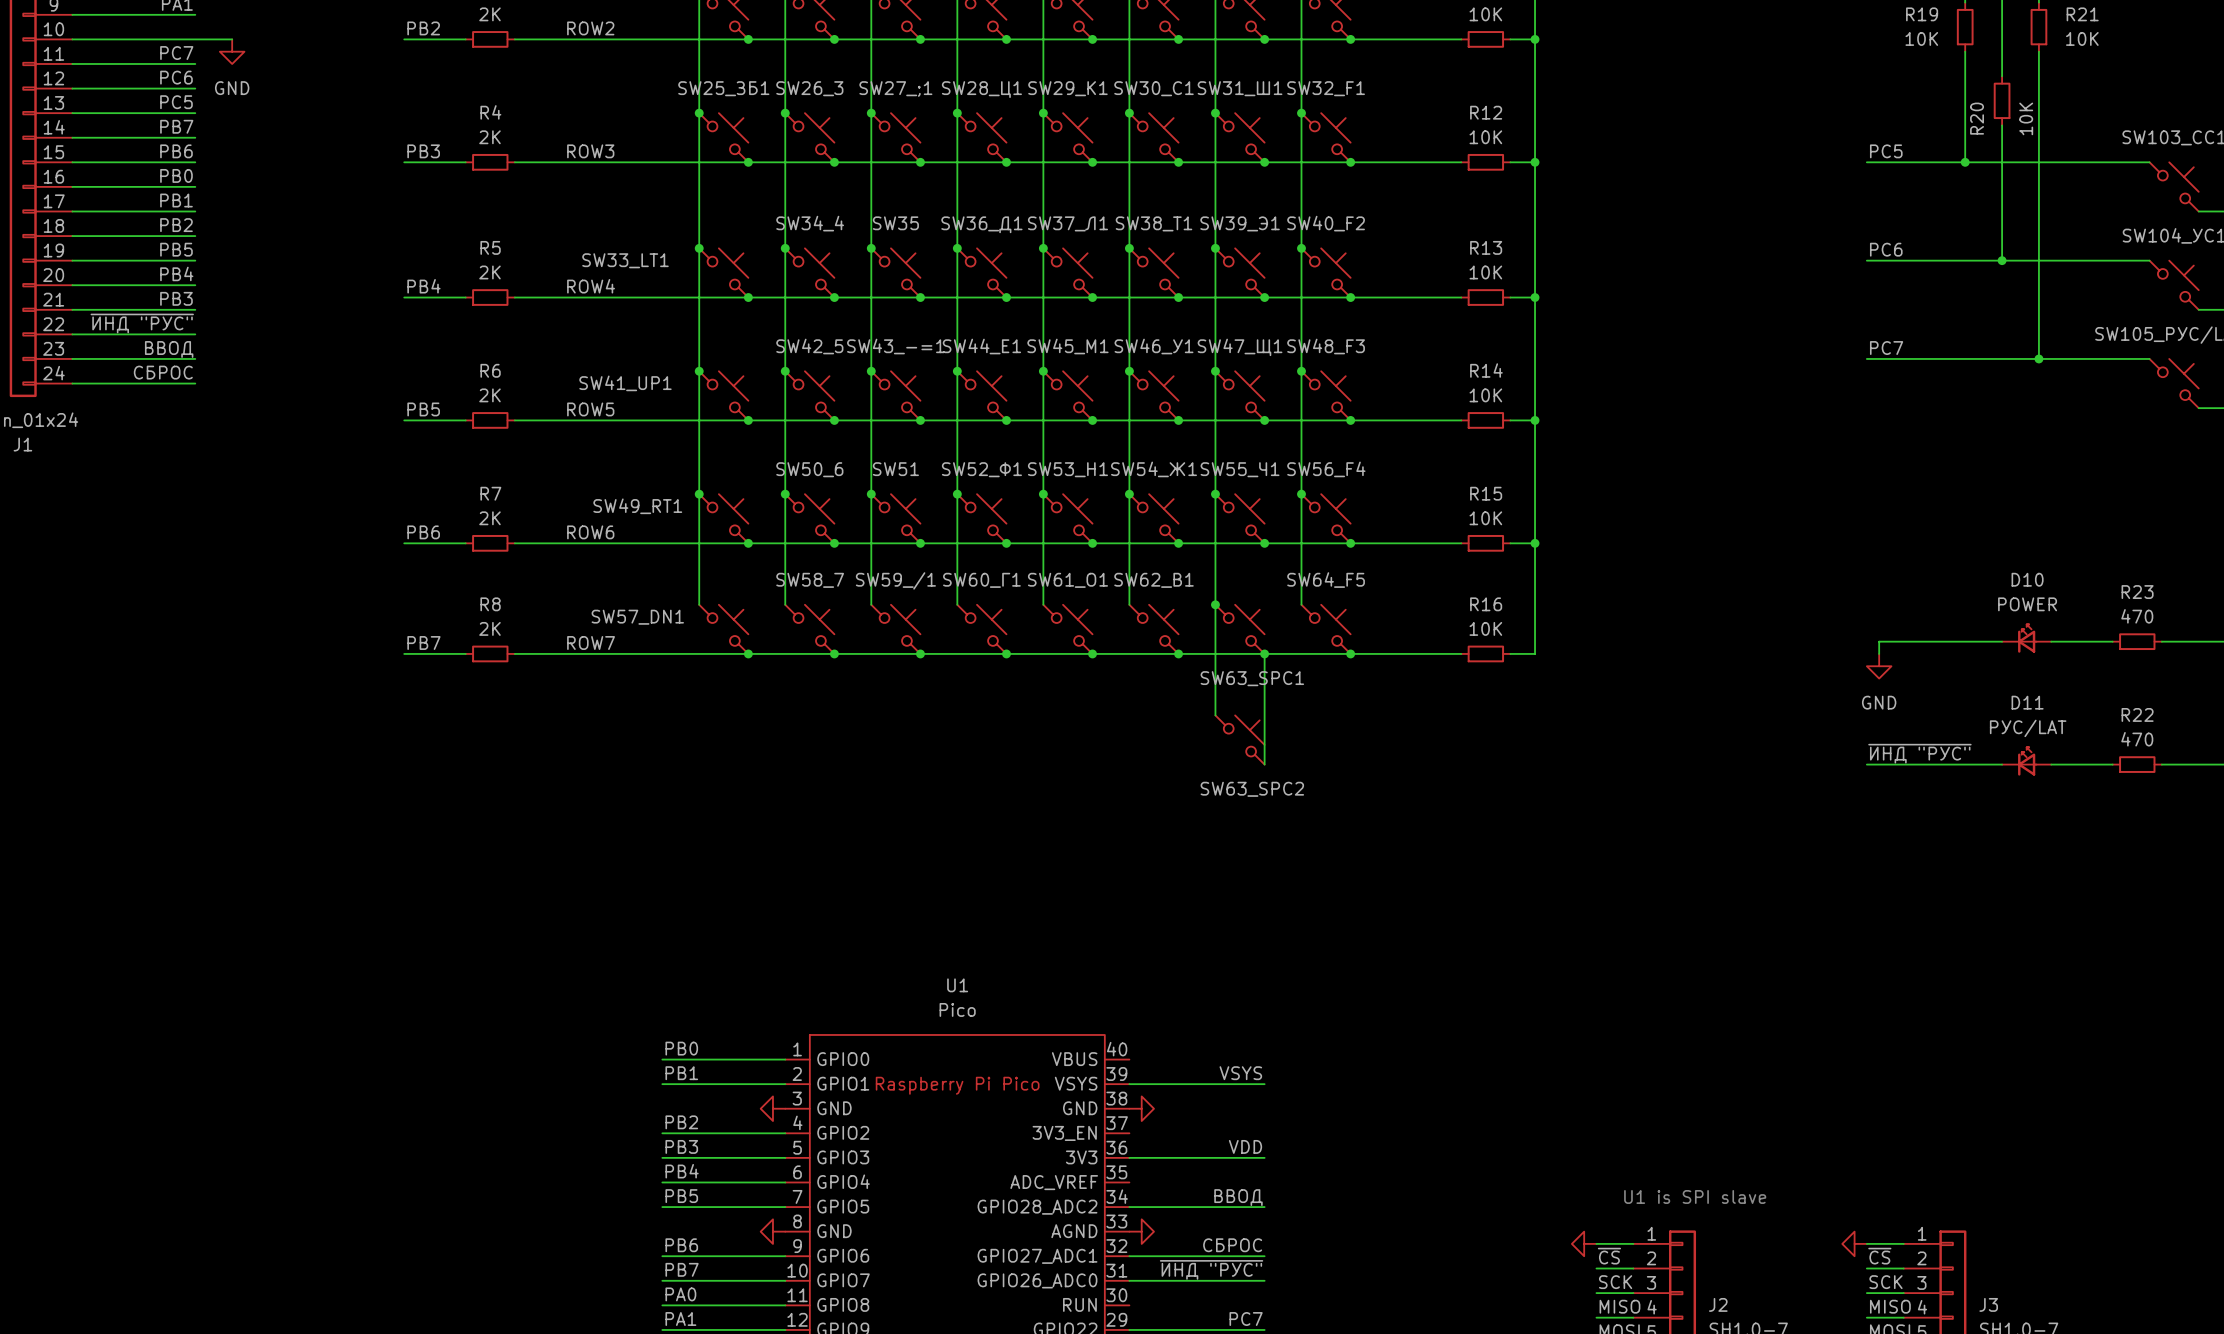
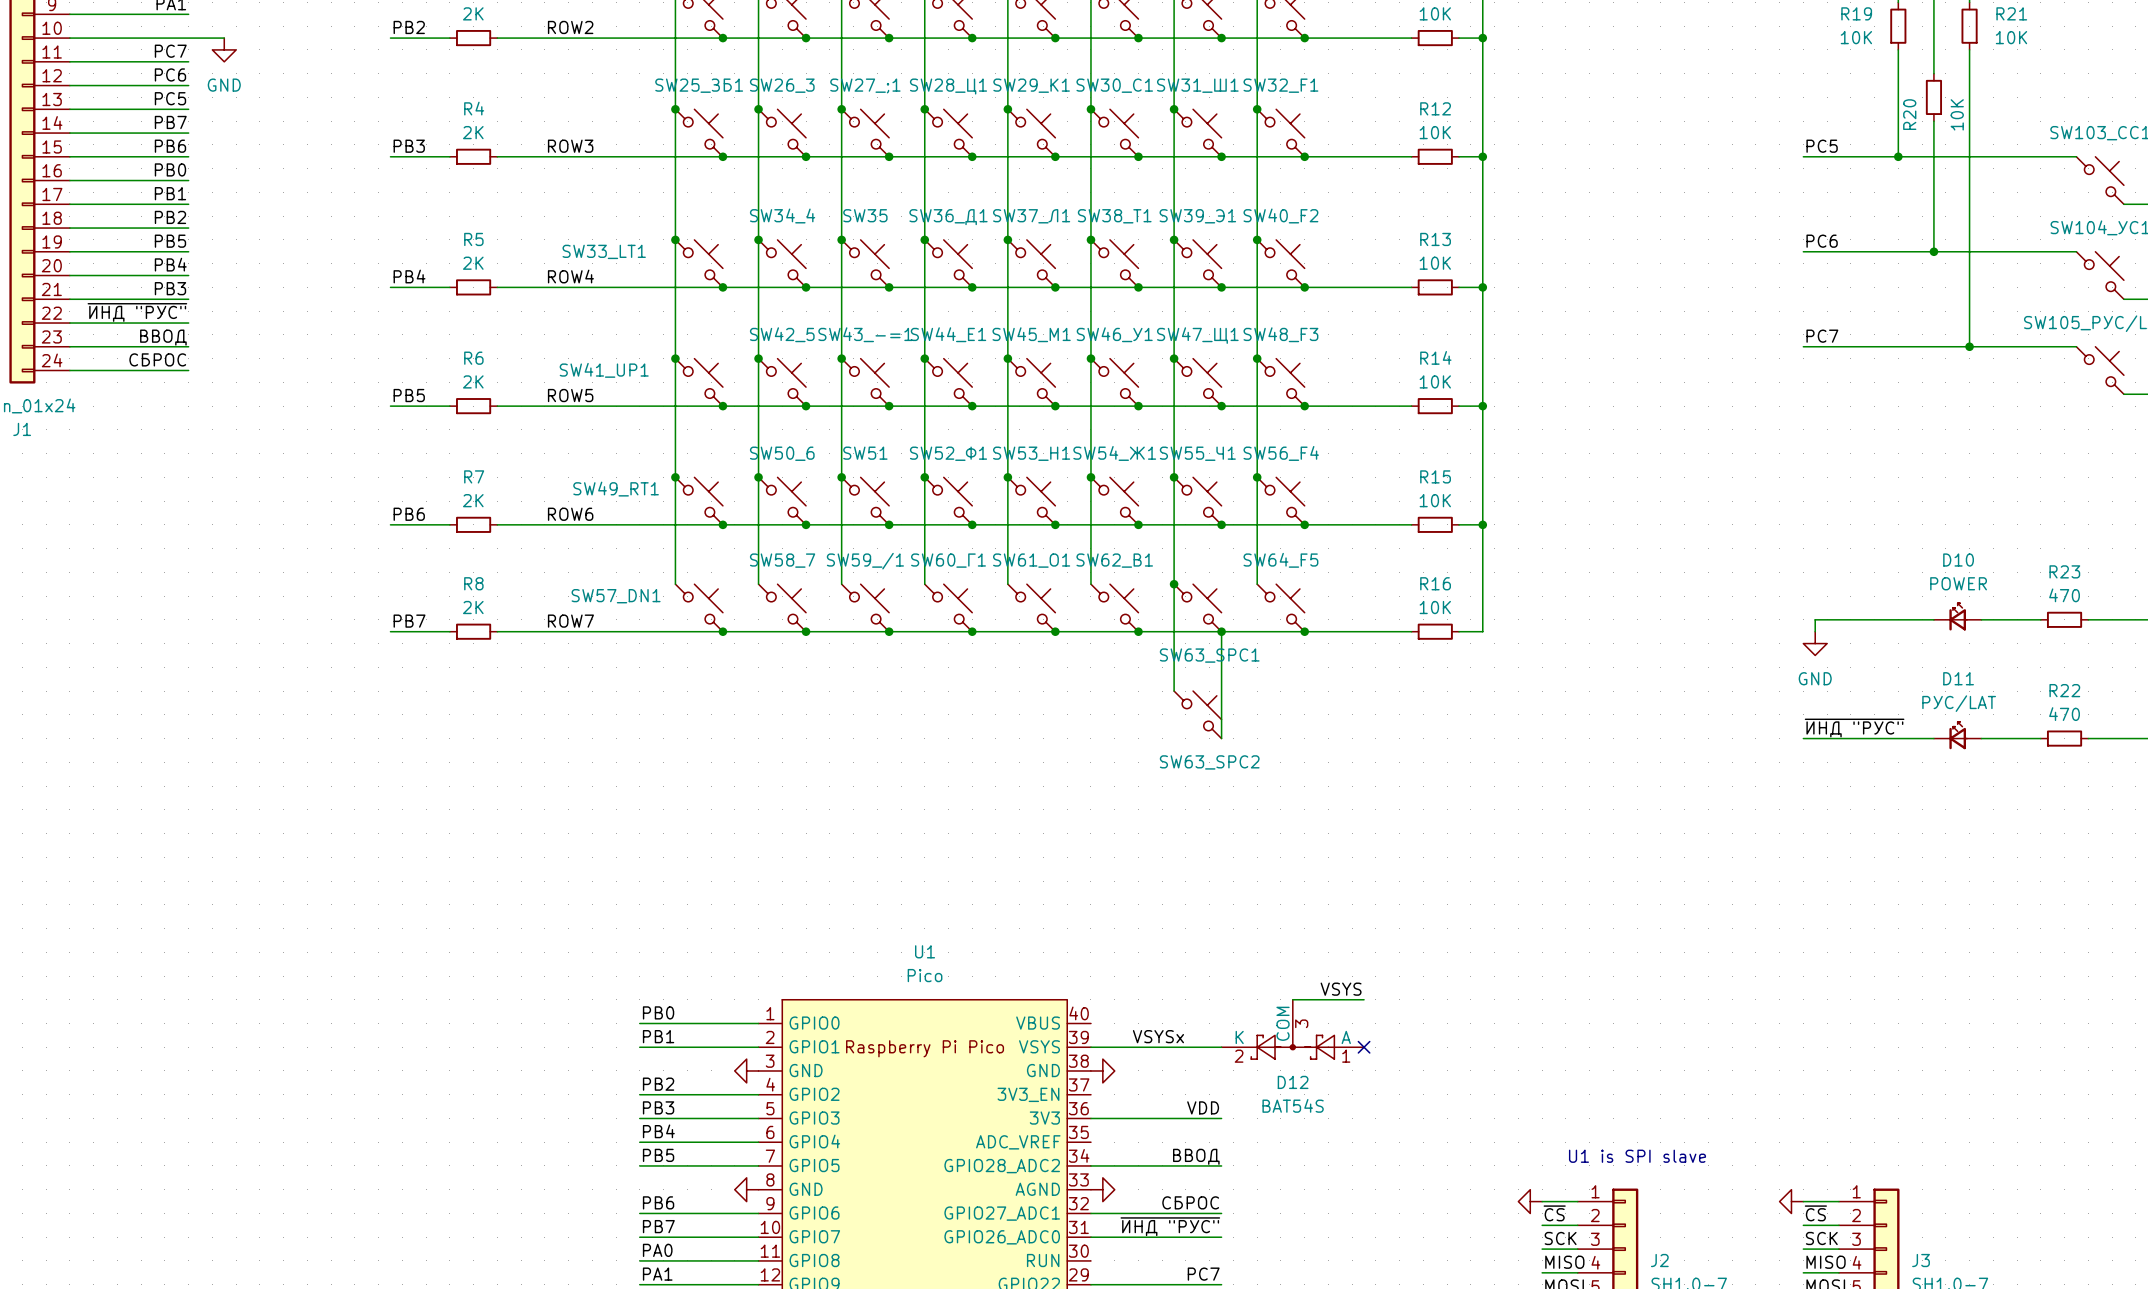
wire: none -> (1292, 999) (1364, 999)
D12: none -> BAT54S (1292, 1029)
label: none -> VSYSx (1158, 1036)
label position: VSYS (1240, 1073) -> VSYS (1341, 989)
no-connect mark: none -> (1364, 1047)

